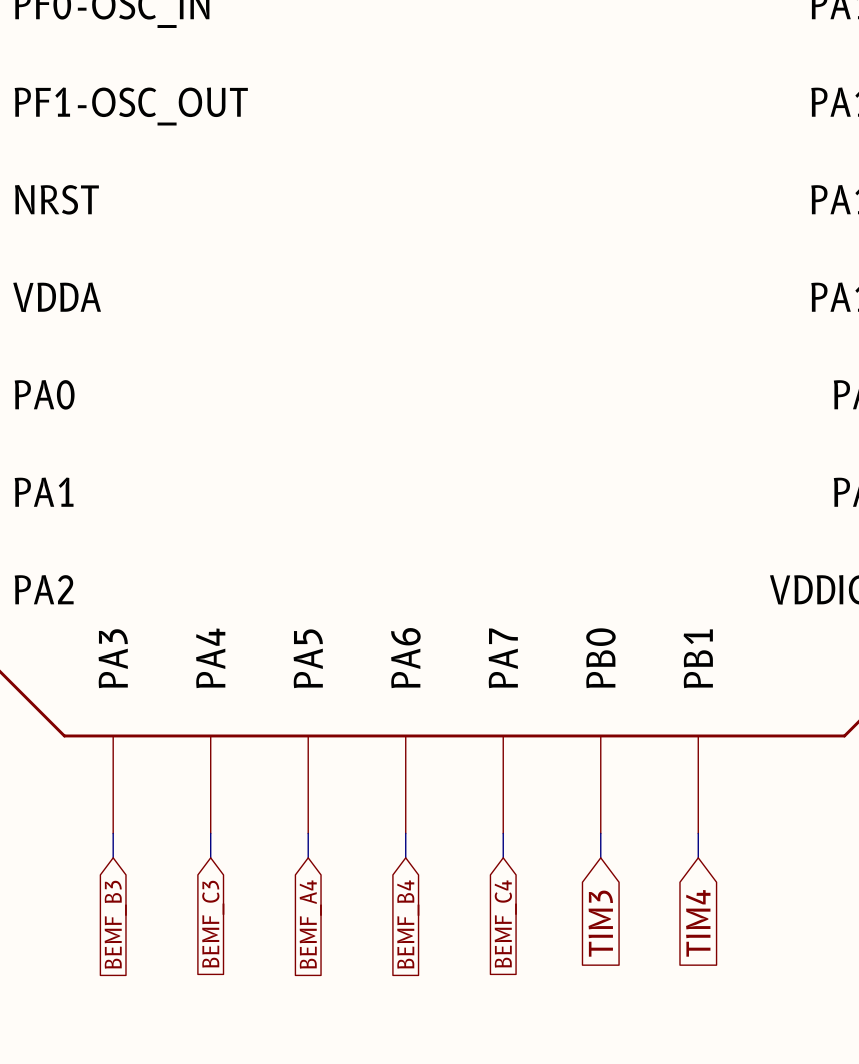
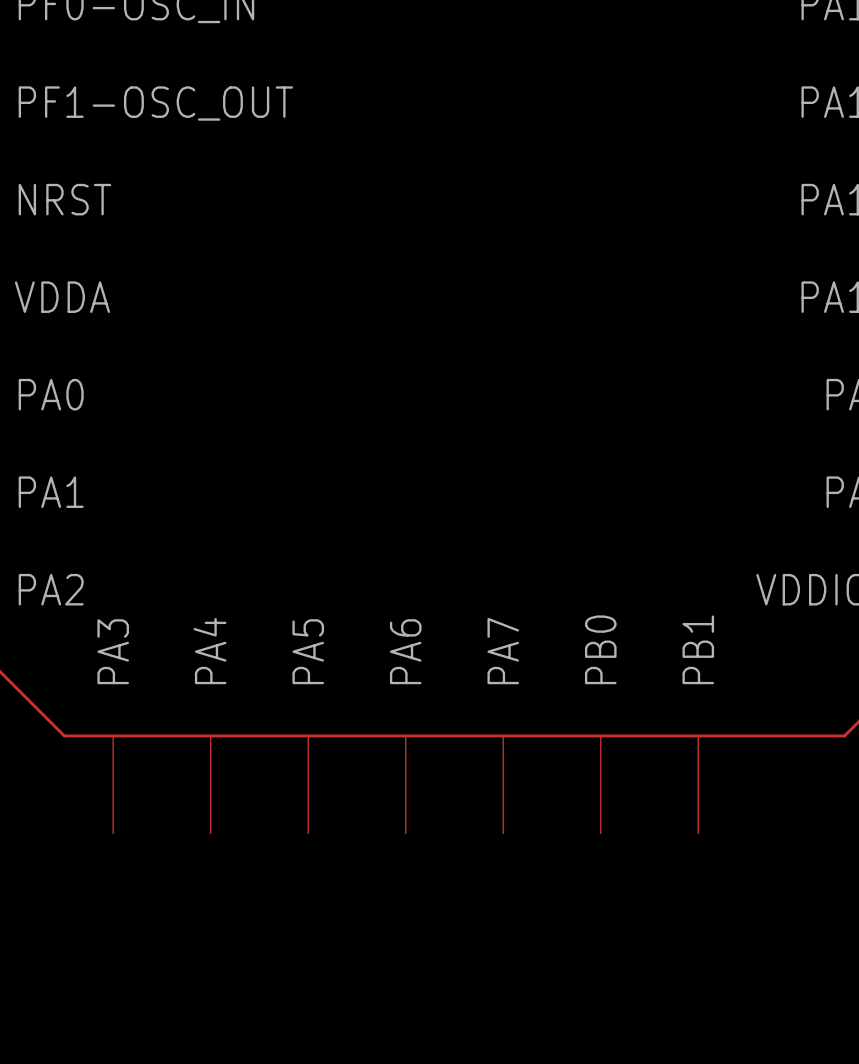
wire: (113, 833) (113, 857) -> none
wire: (210, 833) (210, 857) -> none
wire: (308, 833) (308, 857) -> none
wire: (405, 833) (405, 857) -> none
wire: (503, 833) (503, 857) -> none
wire: (600, 833) (600, 857) -> none
wire: (698, 833) (698, 857) -> none
global label: TIM3 (600, 923) -> none
global label: TIM4 (698, 923) -> none
global label: BEMF_B3 (115, 924) -> none
global label: BEMF_C3 (213, 924) -> none
global label: BEMF_A4 (310, 924) -> none
global label: BEMF_B4 (408, 924) -> none
global label: BEMF_C4 (505, 924) -> none

